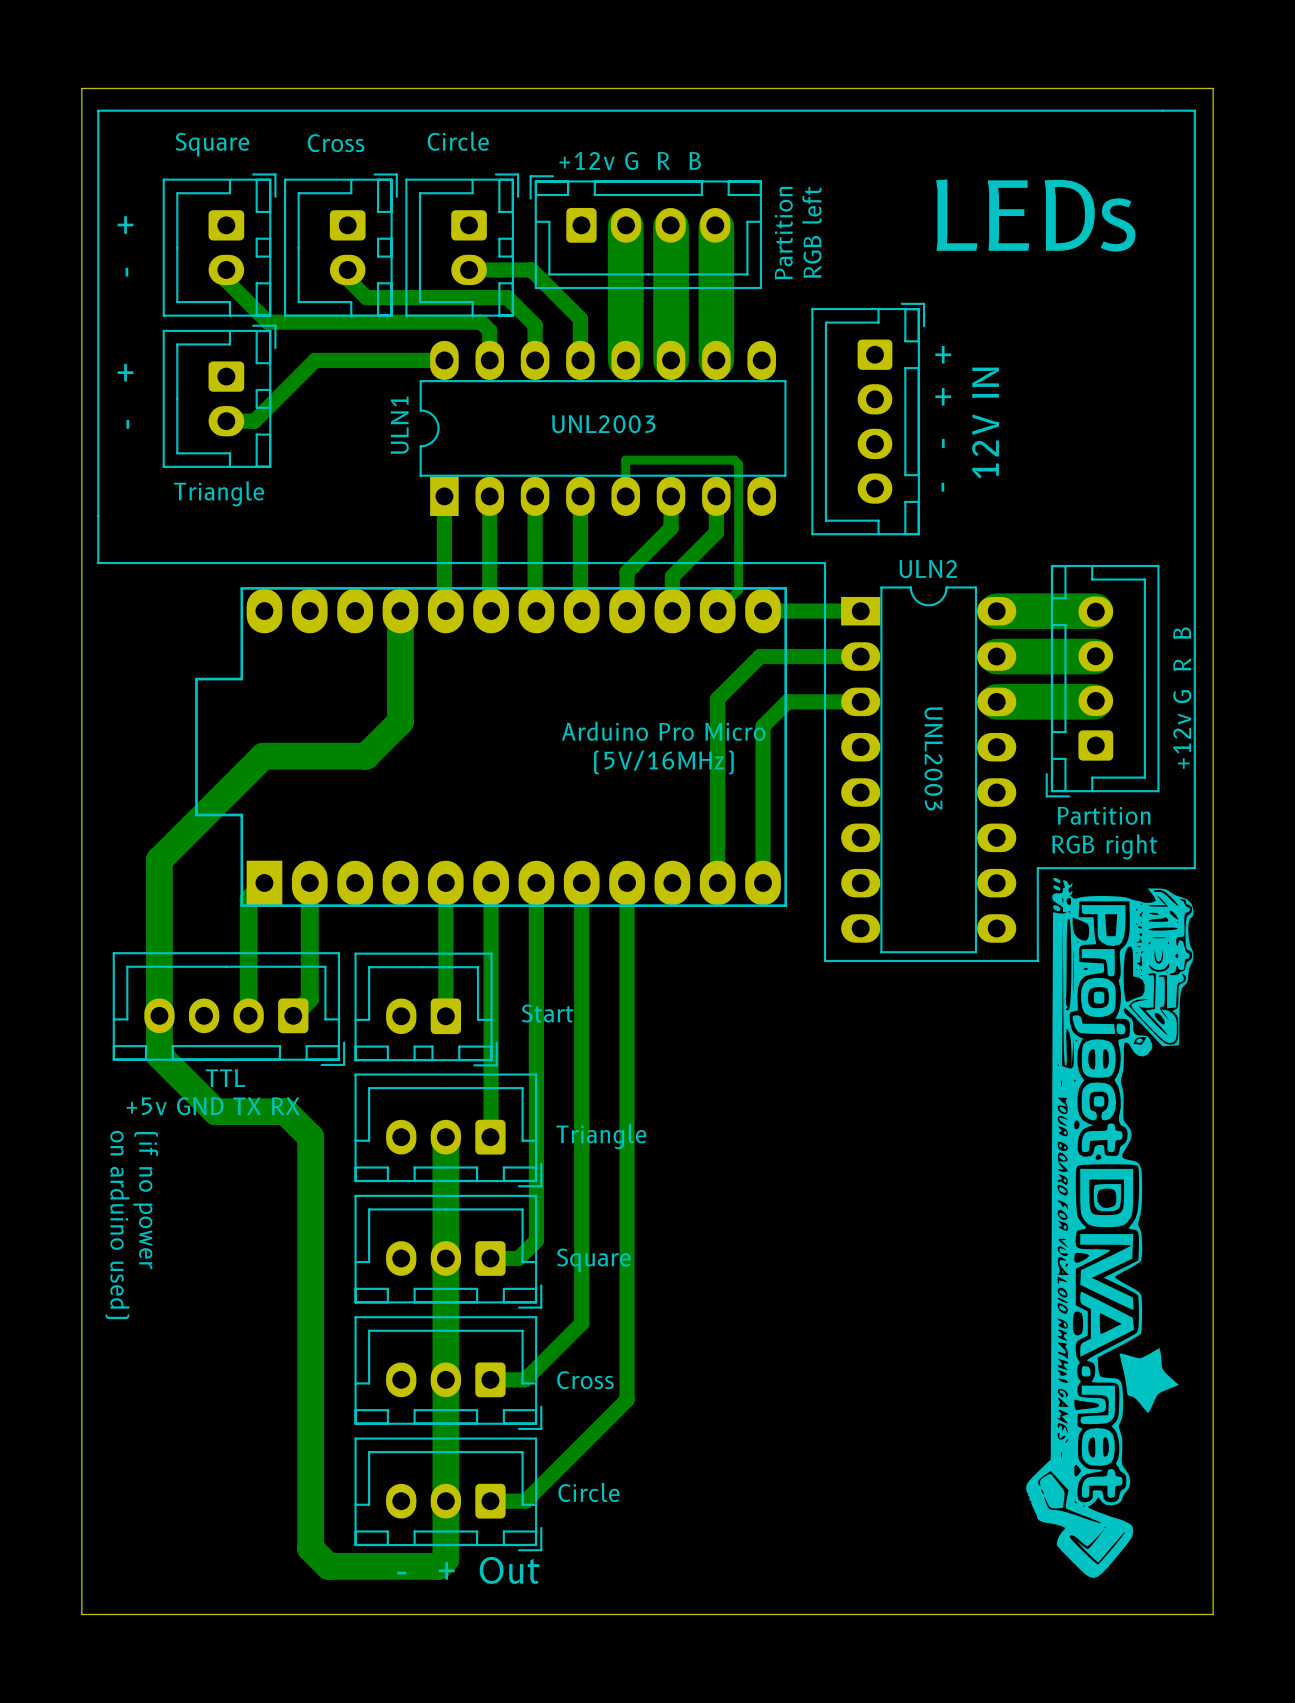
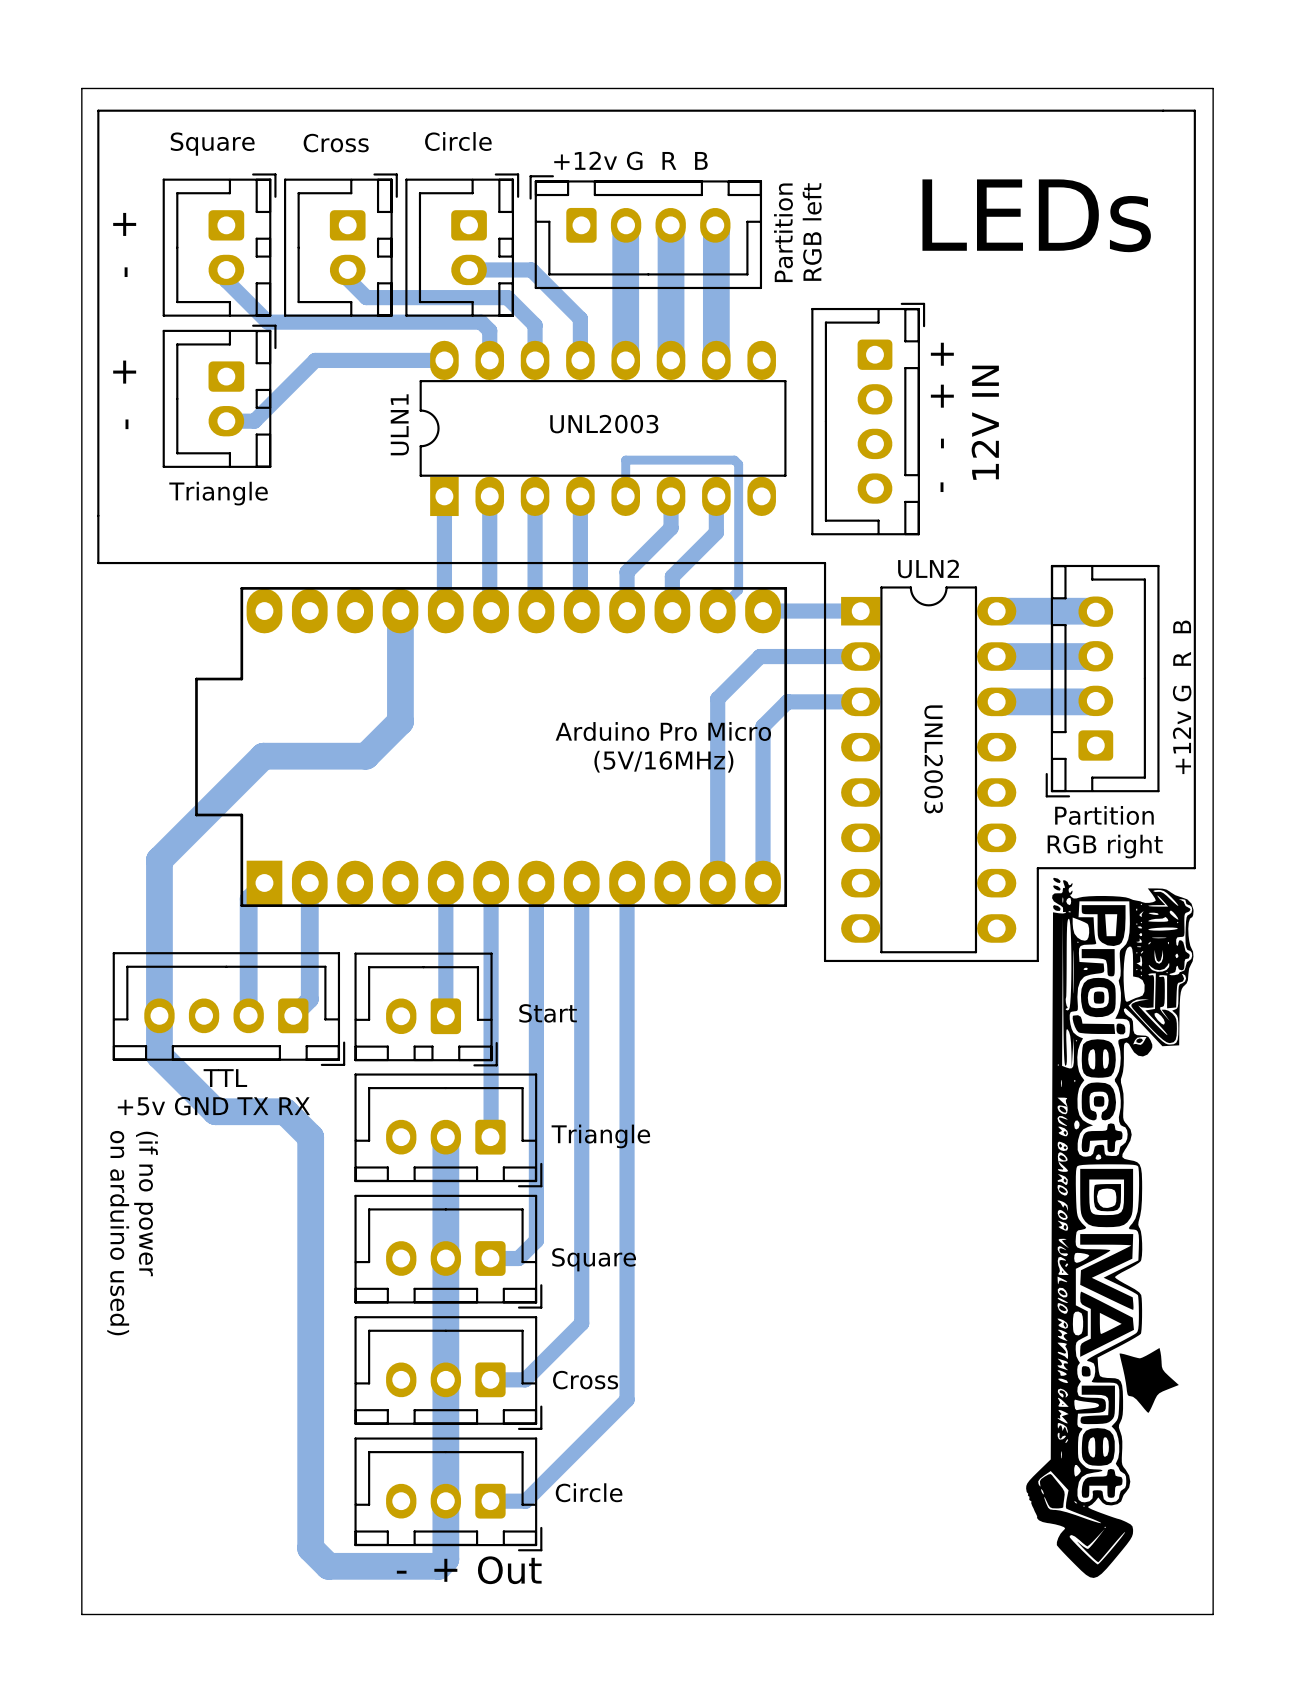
bottom track width: thick (625, 225) (625, 360) -> thin (625, 225) (625, 360)
bottom track width: thick (671, 226) (671, 360) -> thin (671, 226) (671, 360)
bottom track width: thick (716, 227) (716, 360) -> thin (716, 227) (716, 360)
bottom track width: thick (996, 611) (1095, 611) -> thin (996, 611) (1095, 611)
bottom track width: thick (996, 656) (1094, 656) -> thin (996, 656) (1094, 656)
bottom track width: thick (996, 701) (1093, 701) -> thin (996, 701) (1093, 701)

